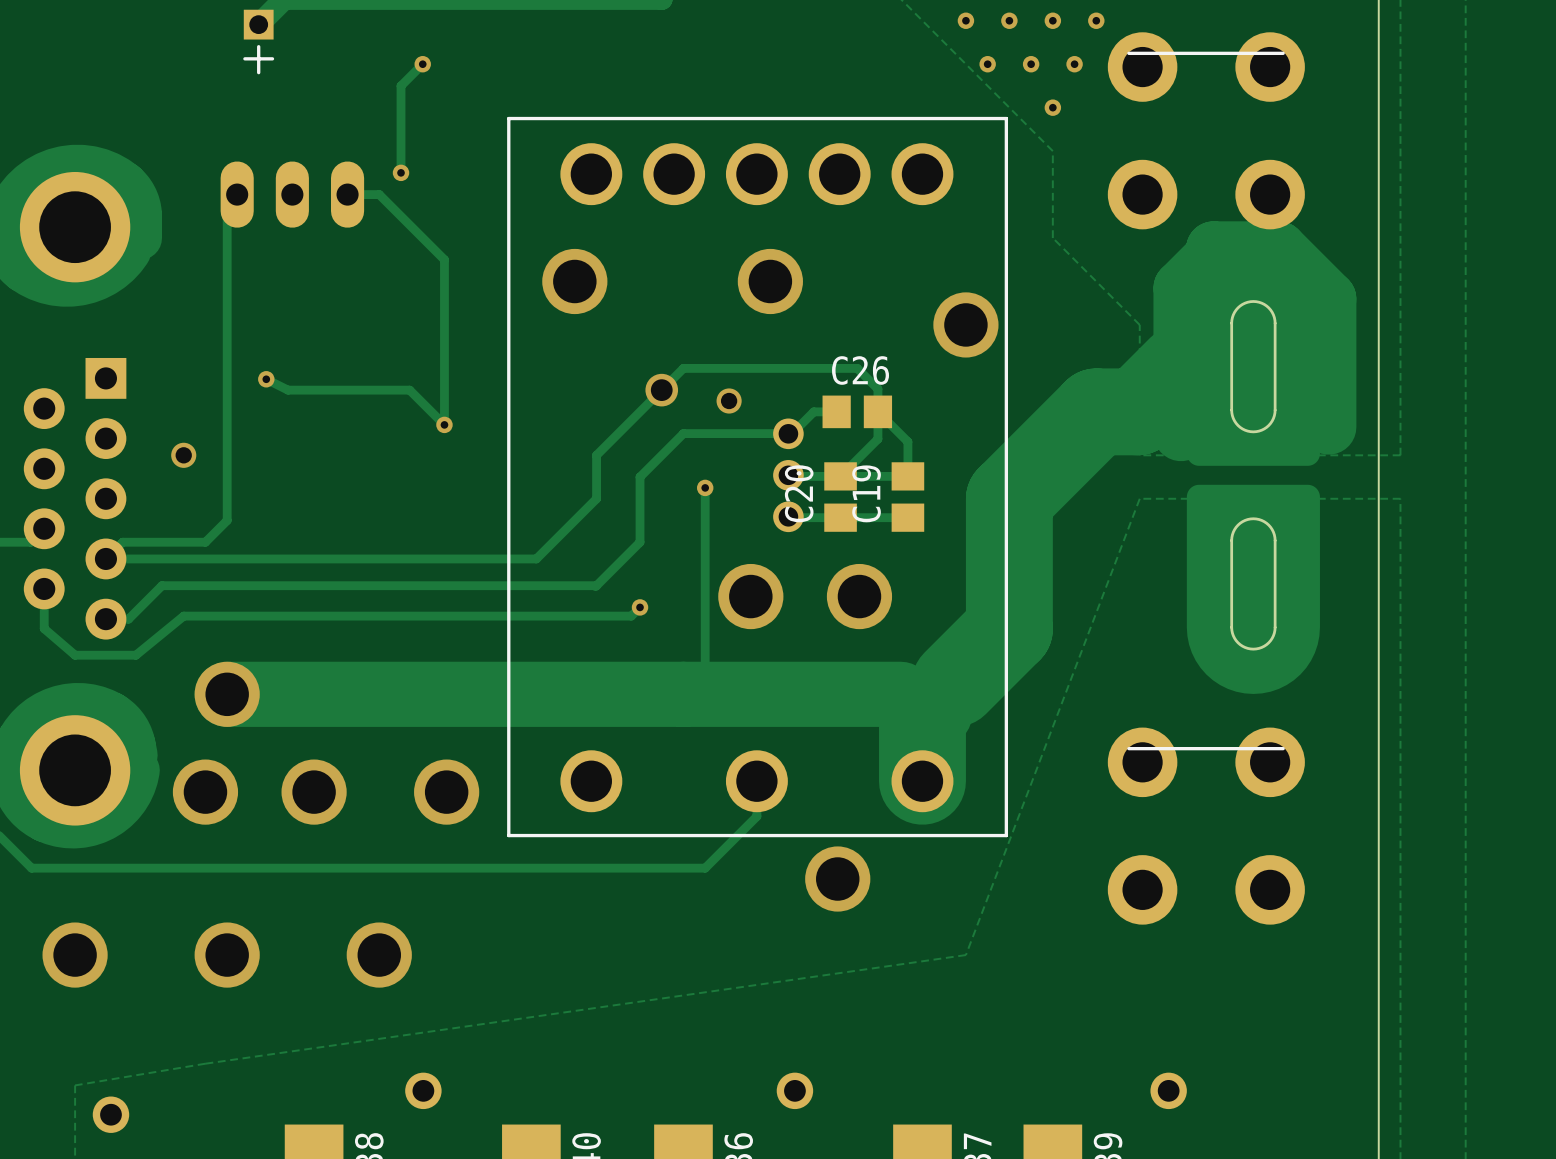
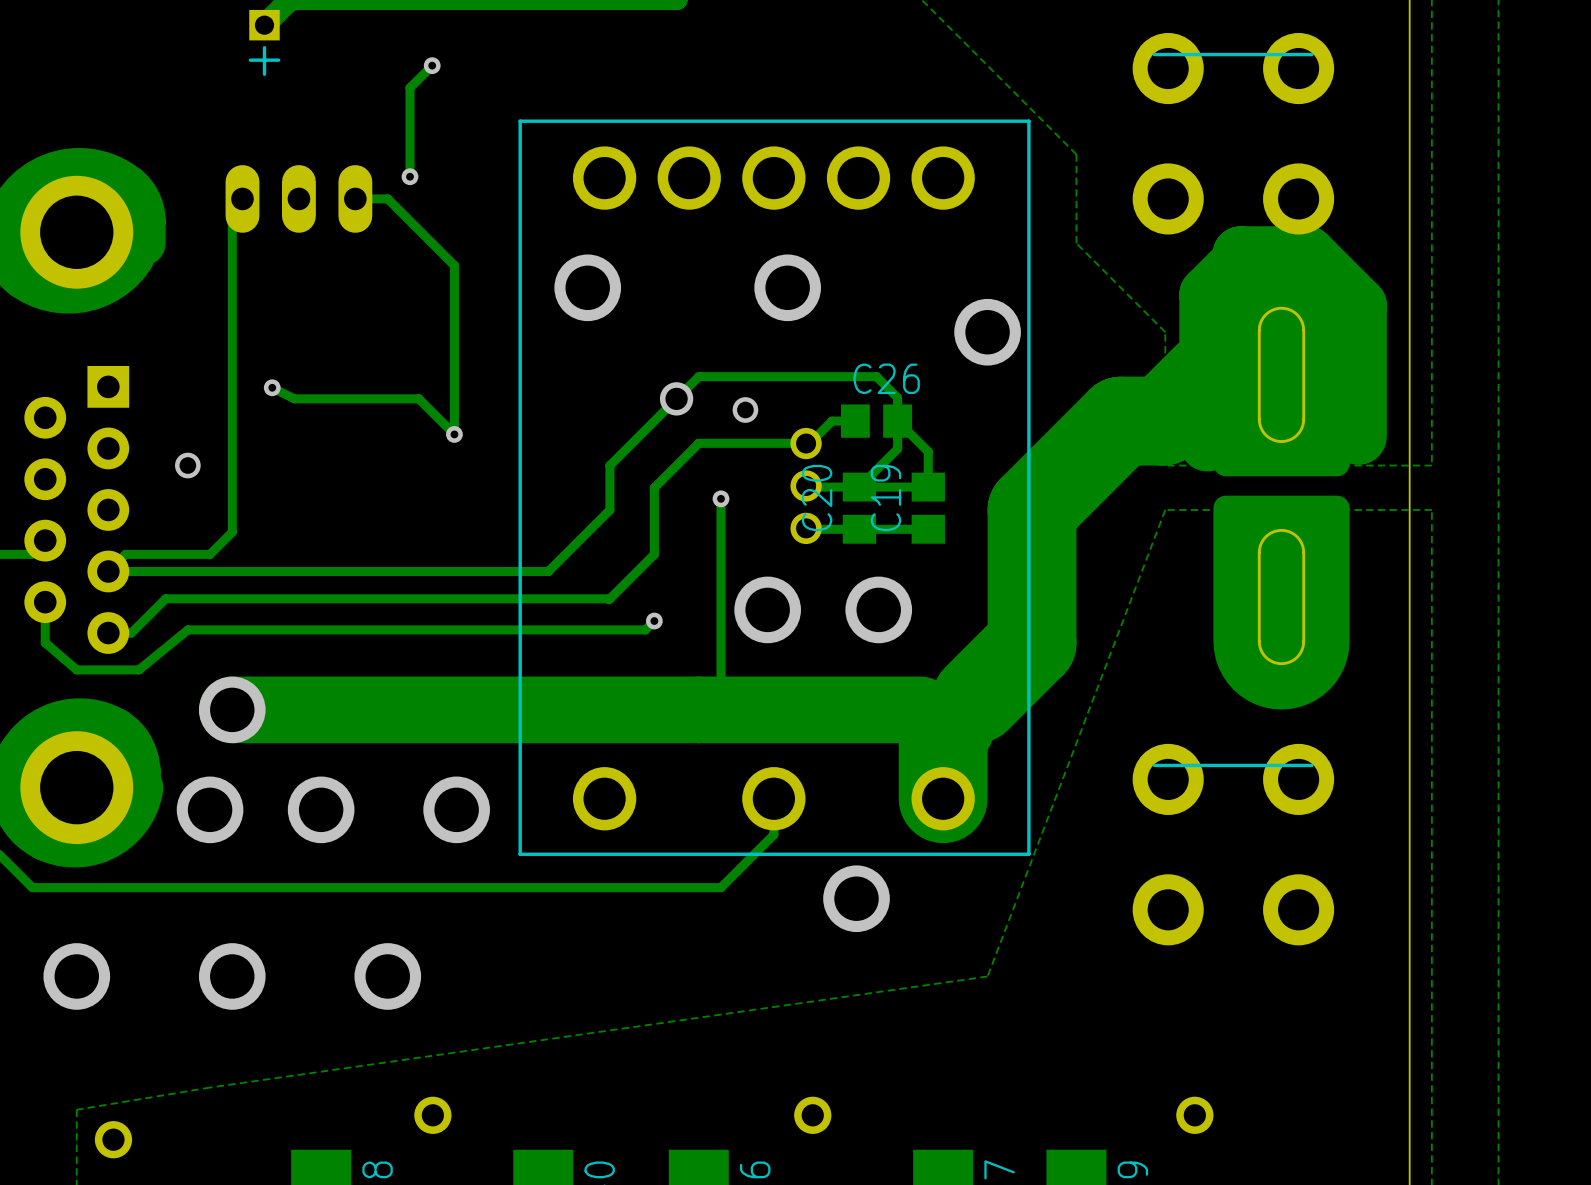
via: (965, 20) -> none
via: (1009, 20) -> none
via: (1052, 20) -> none
via: (1096, 20) -> none
via: (987, 64) -> none
via: (1031, 64) -> none
via: (1074, 64) -> none
via: (1052, 107) -> none

